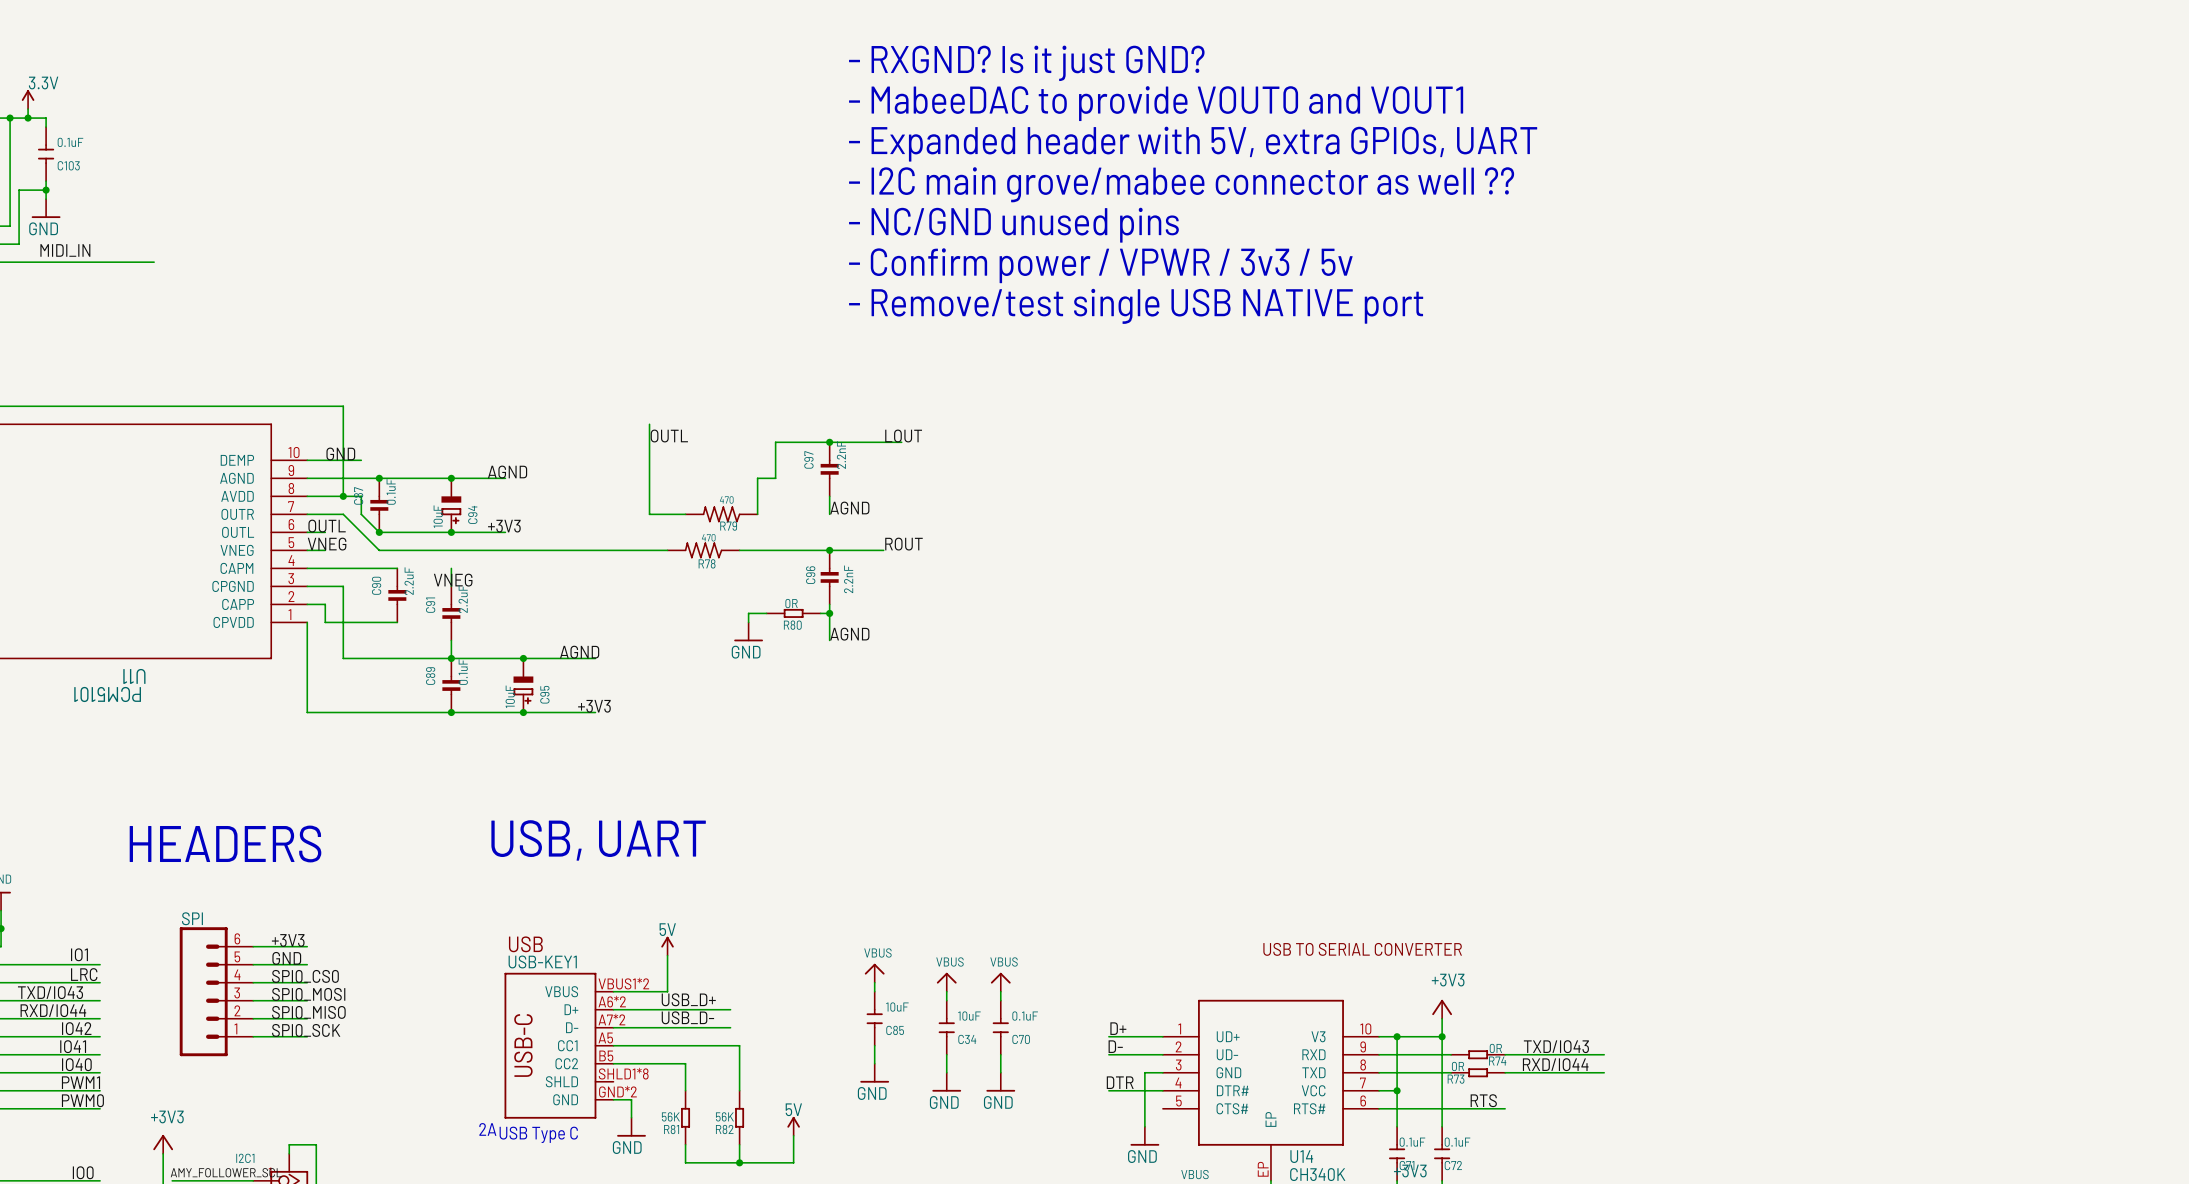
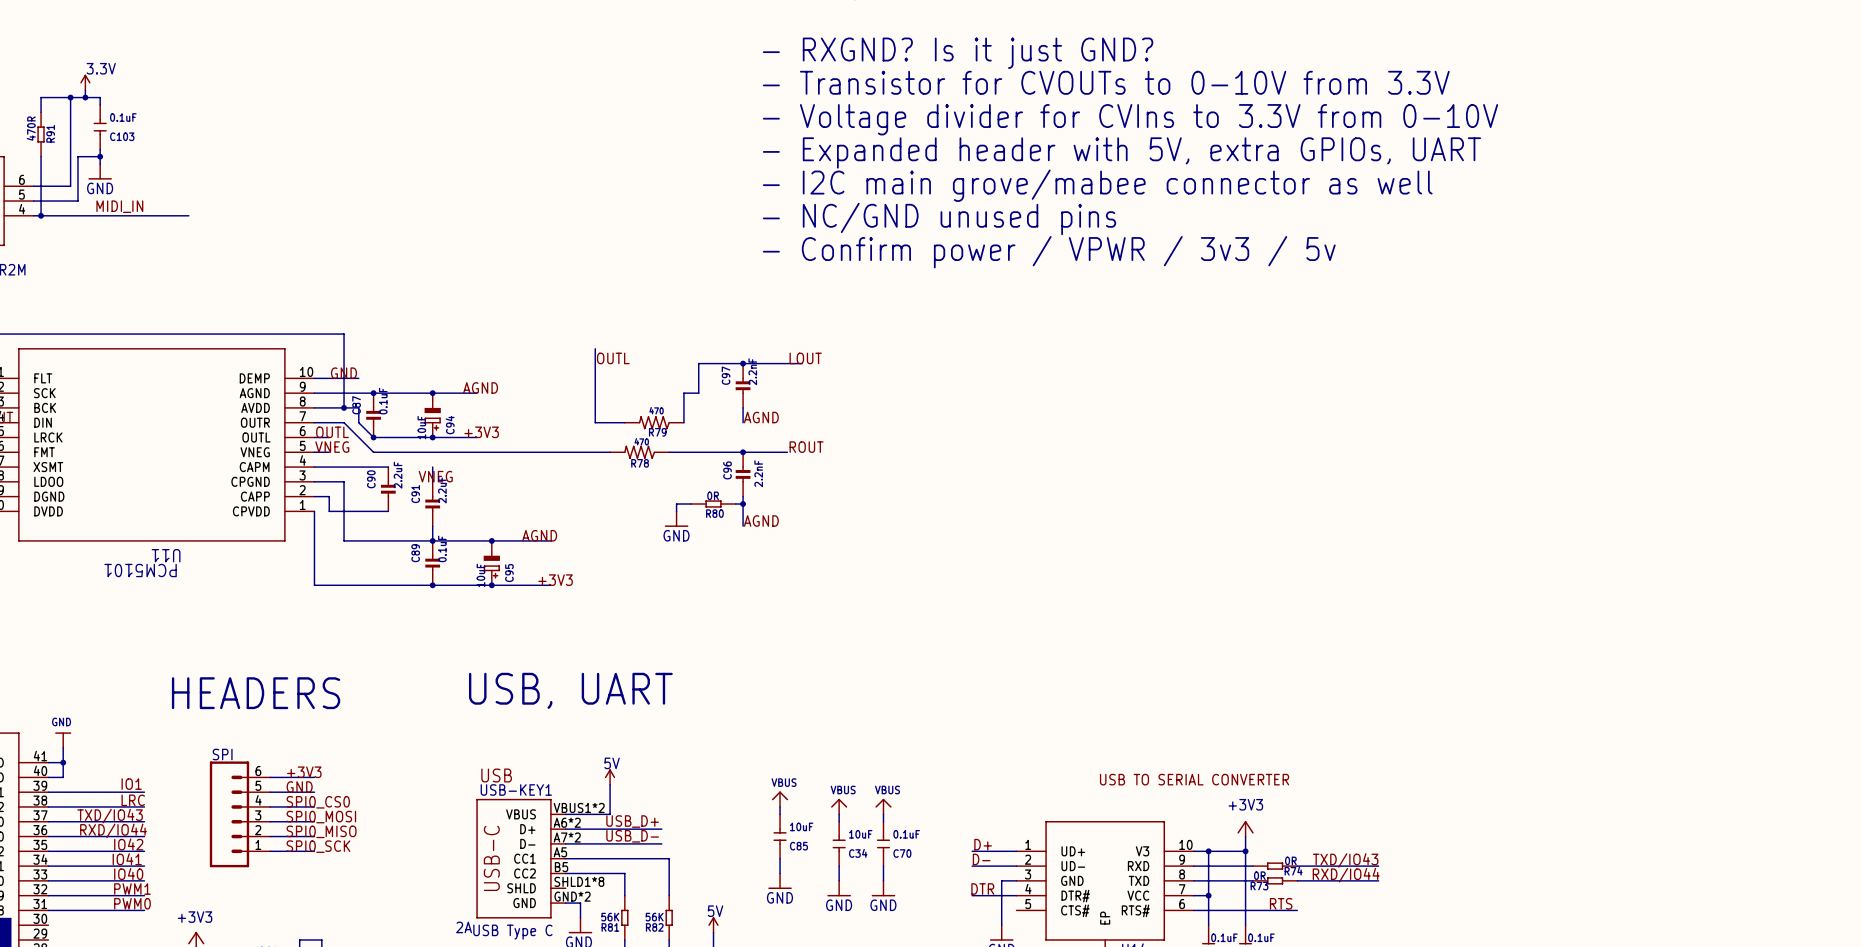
text: - MabeeDAC to provide VOUT0 and VOUT1 (1156, 103) -> - Transistor for CVOUTs to 0-10V from 3.3V (1106, 82)
text: - Expanded header with 5V, extra GPIOs, UART (1193, 144) -> - Voltage divider for CVIns to 3.3V from 0-10V (1130, 119)
text: - I2C main grove/mabee connector as well ?? (1181, 184) -> - Expanded header with 5V, extra GPIOs, UART (1121, 152)
text: - NC/GND unused pins (1013, 225) -> - I2C main grove/mabee connector as well (1097, 185)
text: - Confirm power / VPWR / 3v3 / 5v (1100, 265) -> - NC/GND unused pins (939, 218)
text: - Remove/test single USB NATIVE port (1136, 306) -> - Confirm power / VPWR / 3v3 / 5v (1049, 252)

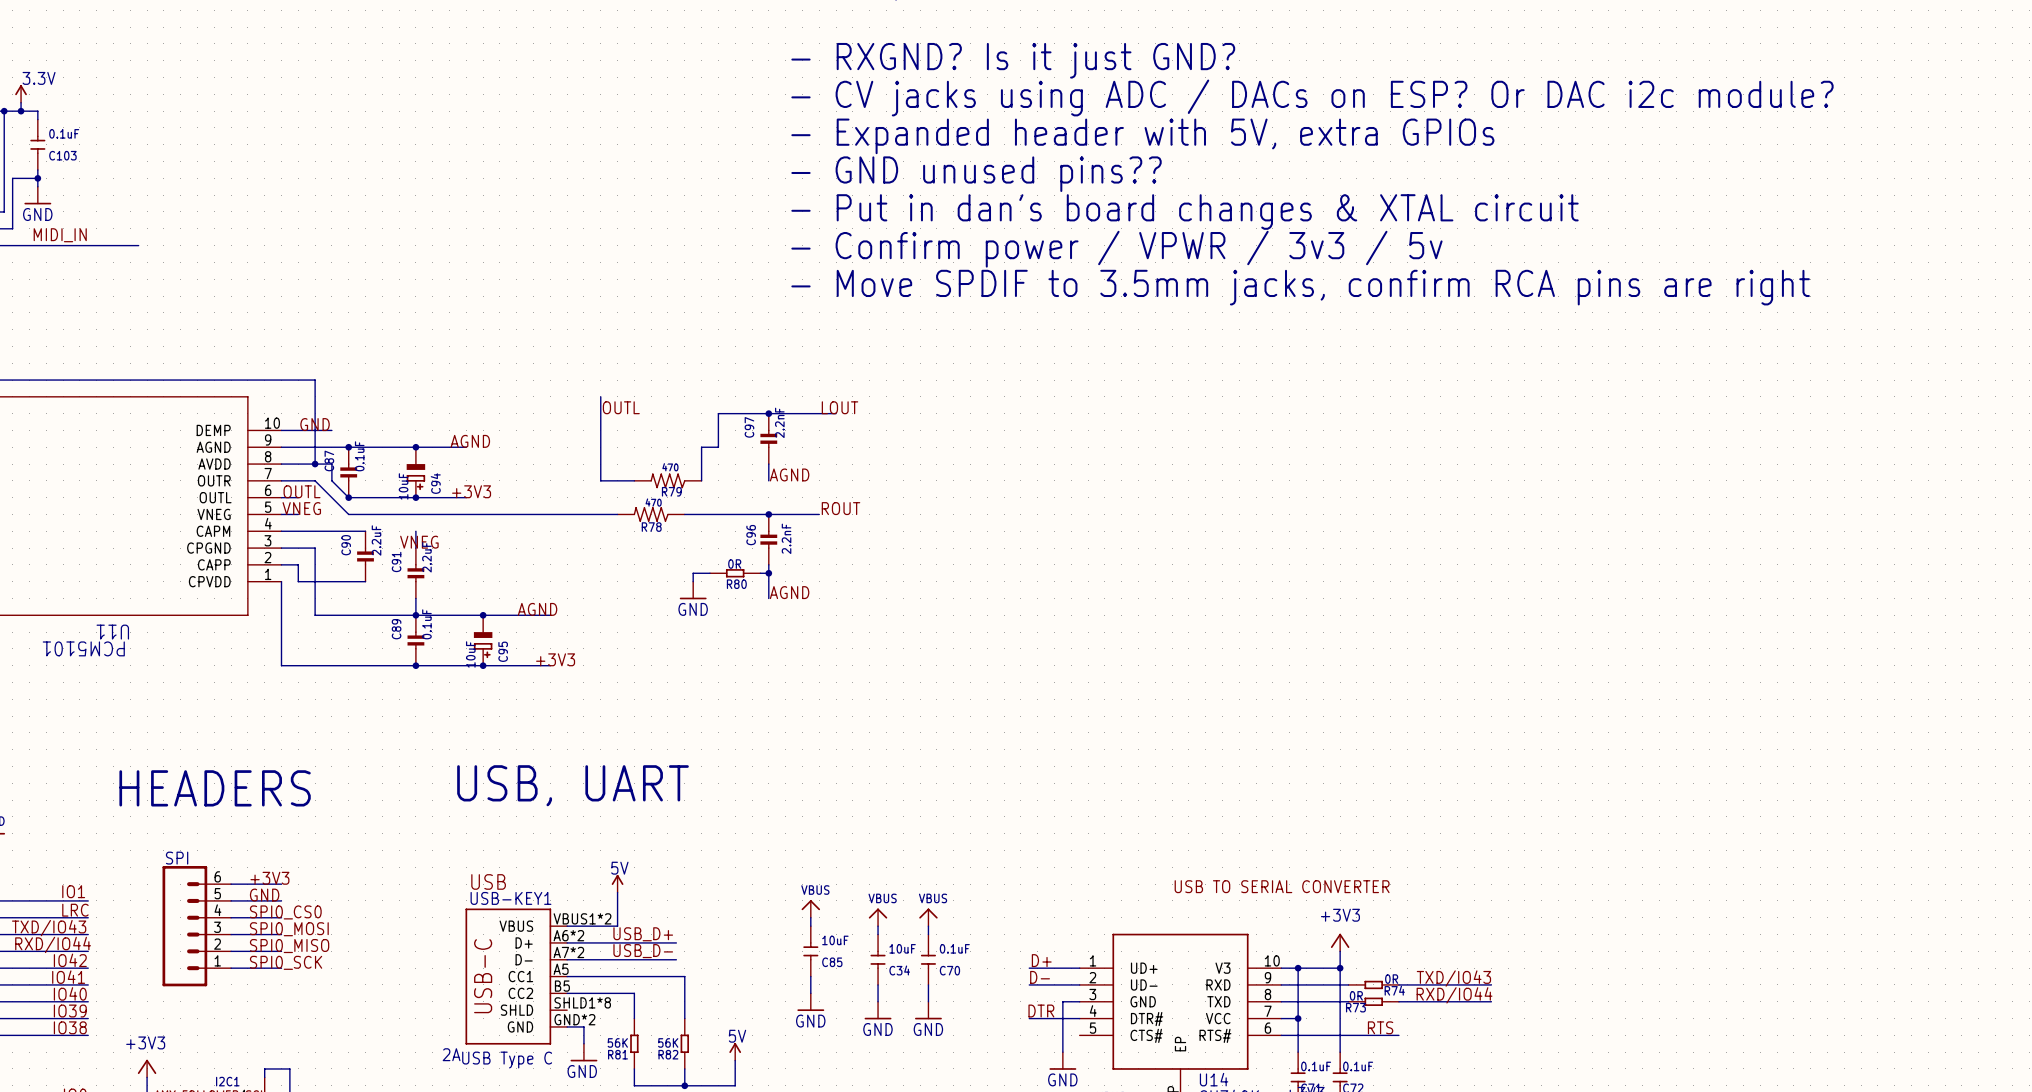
text: - Transistor for CVOUTs to 0-10V from 3.3V (1106, 82) -> - CV jacks using ADC / DACs on ESP? Or DAC i2c module? (1312, 97)
text: - Voltage divider for CVIns to 3.3V from 0-10V (1130, 119) -> - Expanded header with 5V, extra GPIOs (1142, 136)
text: - Expanded header with 5V, extra GPIOs, UART (1121, 152) -> - GND unused pins?? (976, 174)
text: - I2C main grove/mabee connector as well (1097, 185) -> - Put in dan's board changes & XTAL circuit (1185, 211)
text: - NC/GND unused pins (939, 218) -> - Confirm power / VPWR / 3v3 / 5v (1116, 249)
text: - Confirm power / VPWR / 3v3 / 5v (1049, 252) -> - Move SPDIF to 3.5mm jacks, confirm RCA pins are right (1300, 287)
label: PWM1 (132, 889) -> IO39 (70, 1011)
label: PWM0 (132, 903) -> IO38 (70, 1027)

